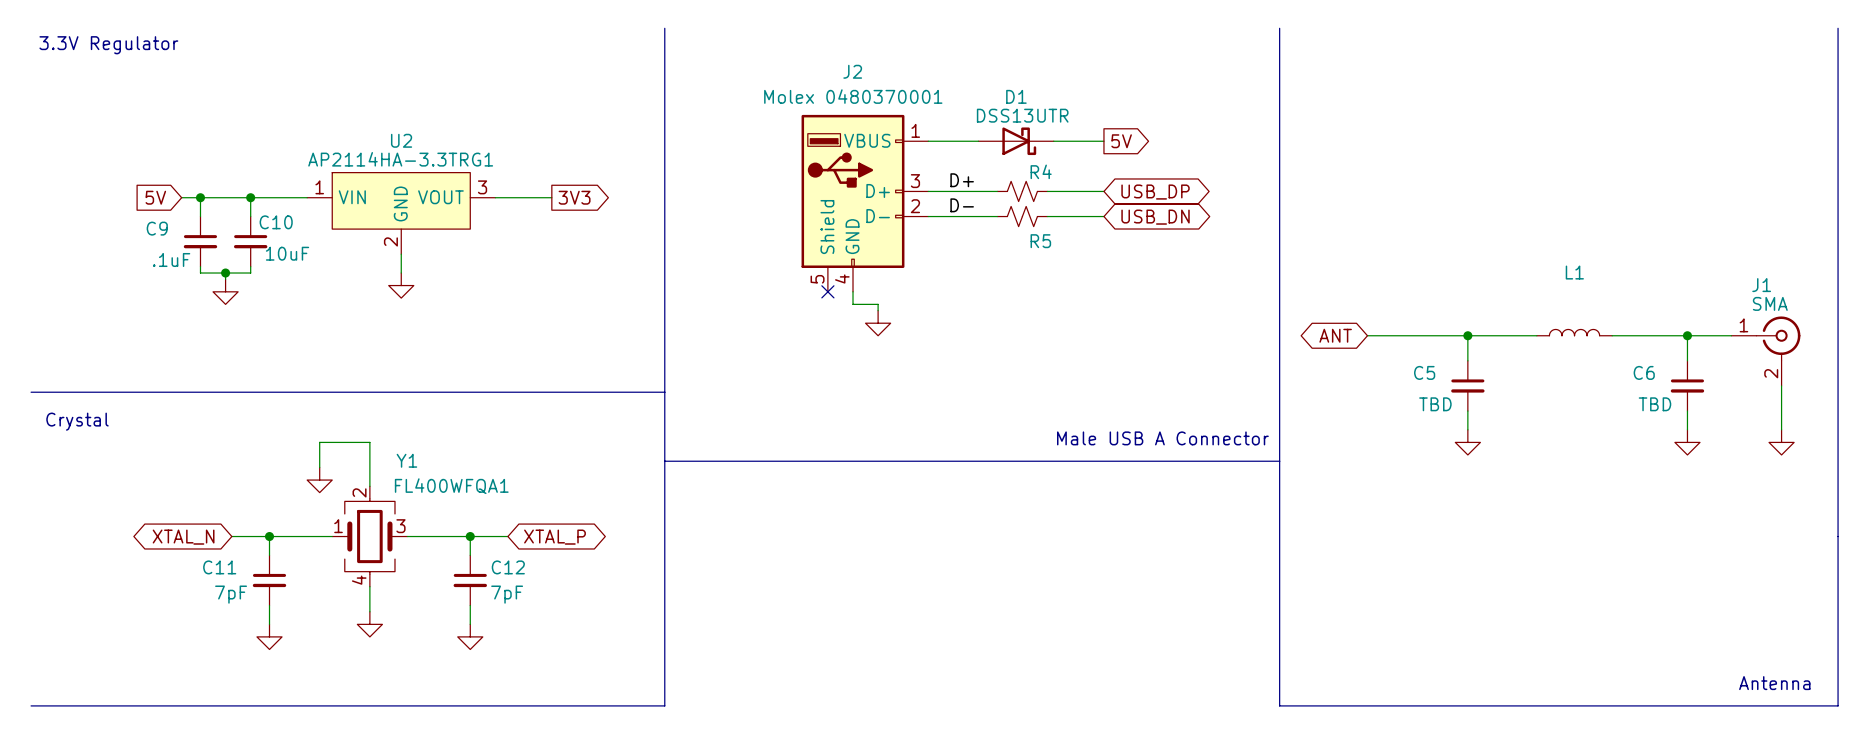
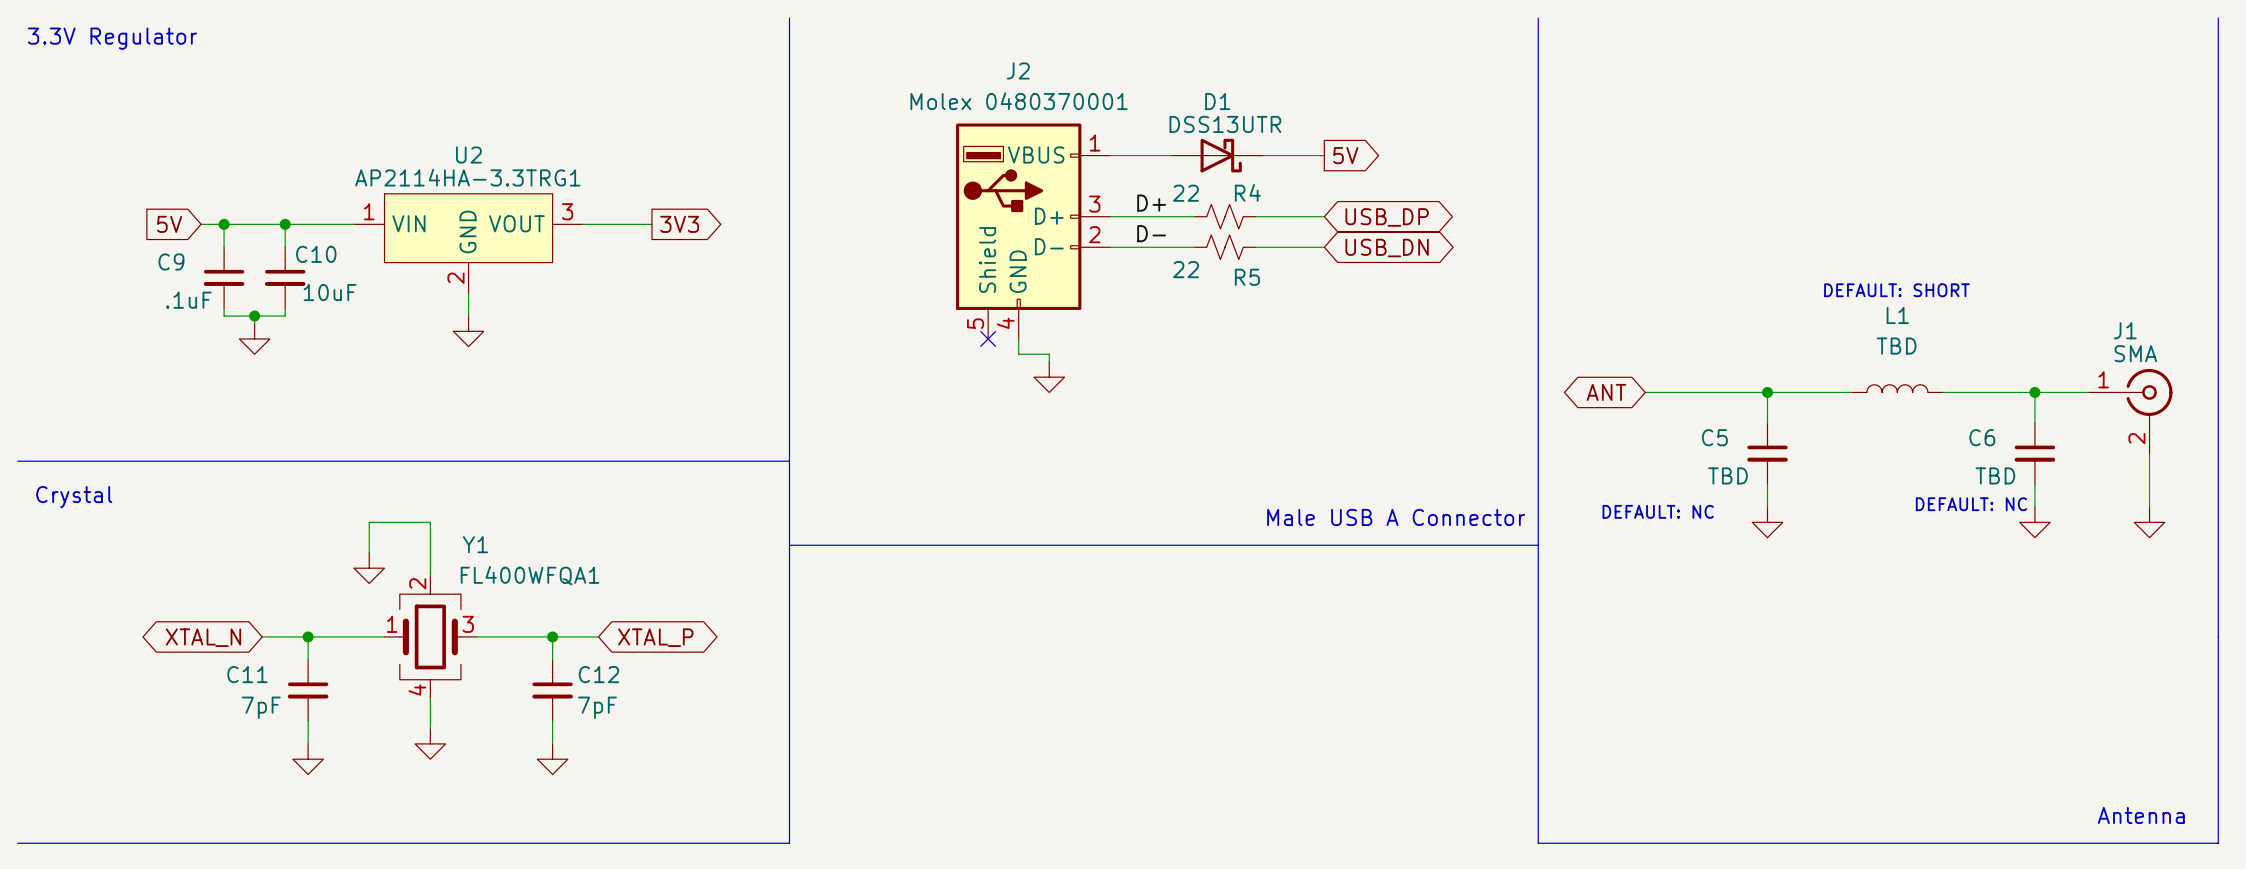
R4 value: none -> 22 (1185, 193)
R5 value: none -> 22 (1185, 269)
text: none -> DEFAULT: SHORT (1896, 290)
L1 value: none -> TBD (1896, 346)
text: none -> DEFAULT: NC (1971, 504)
text: none -> DEFAULT: NC (1658, 511)

